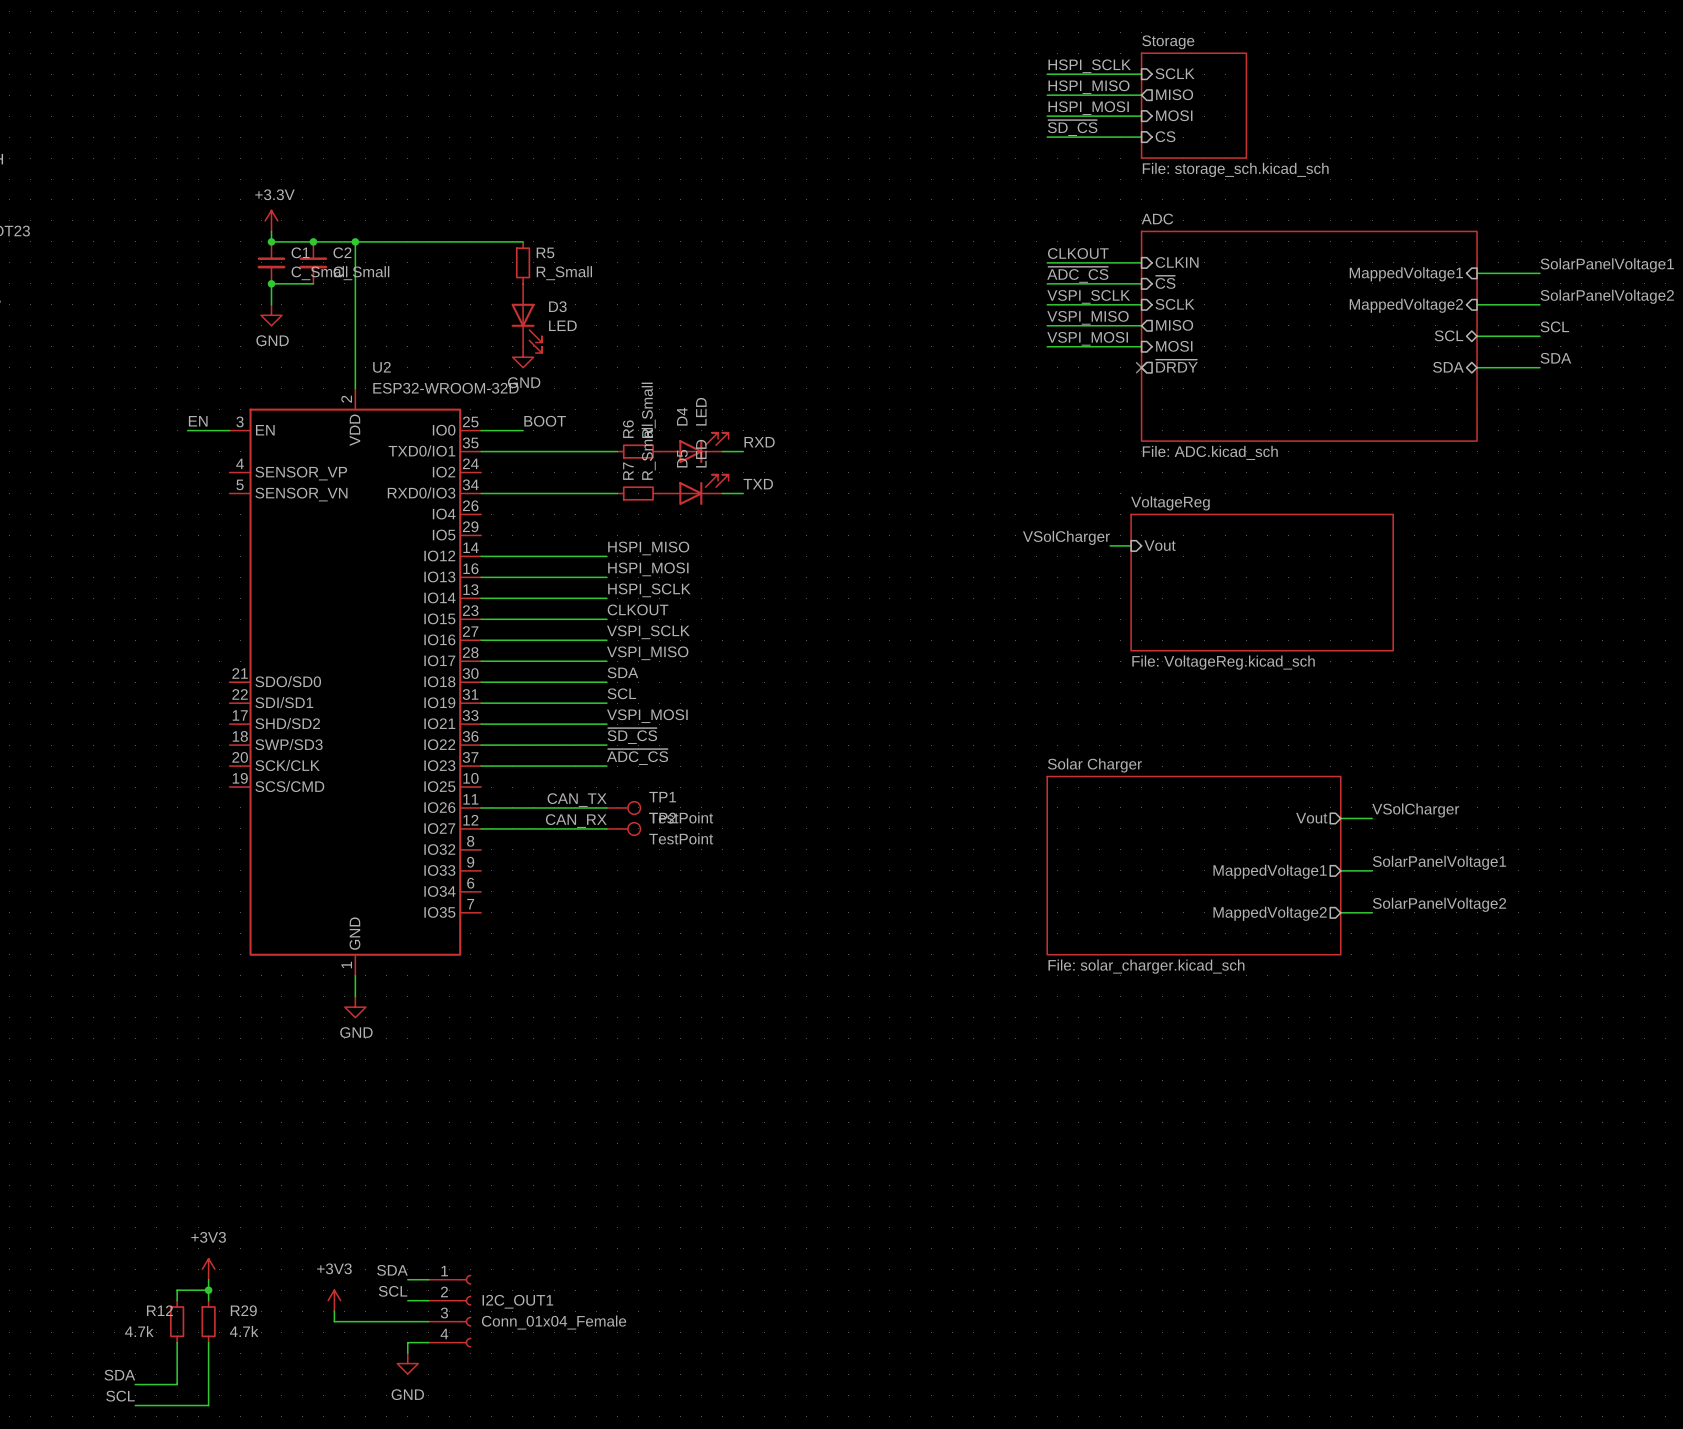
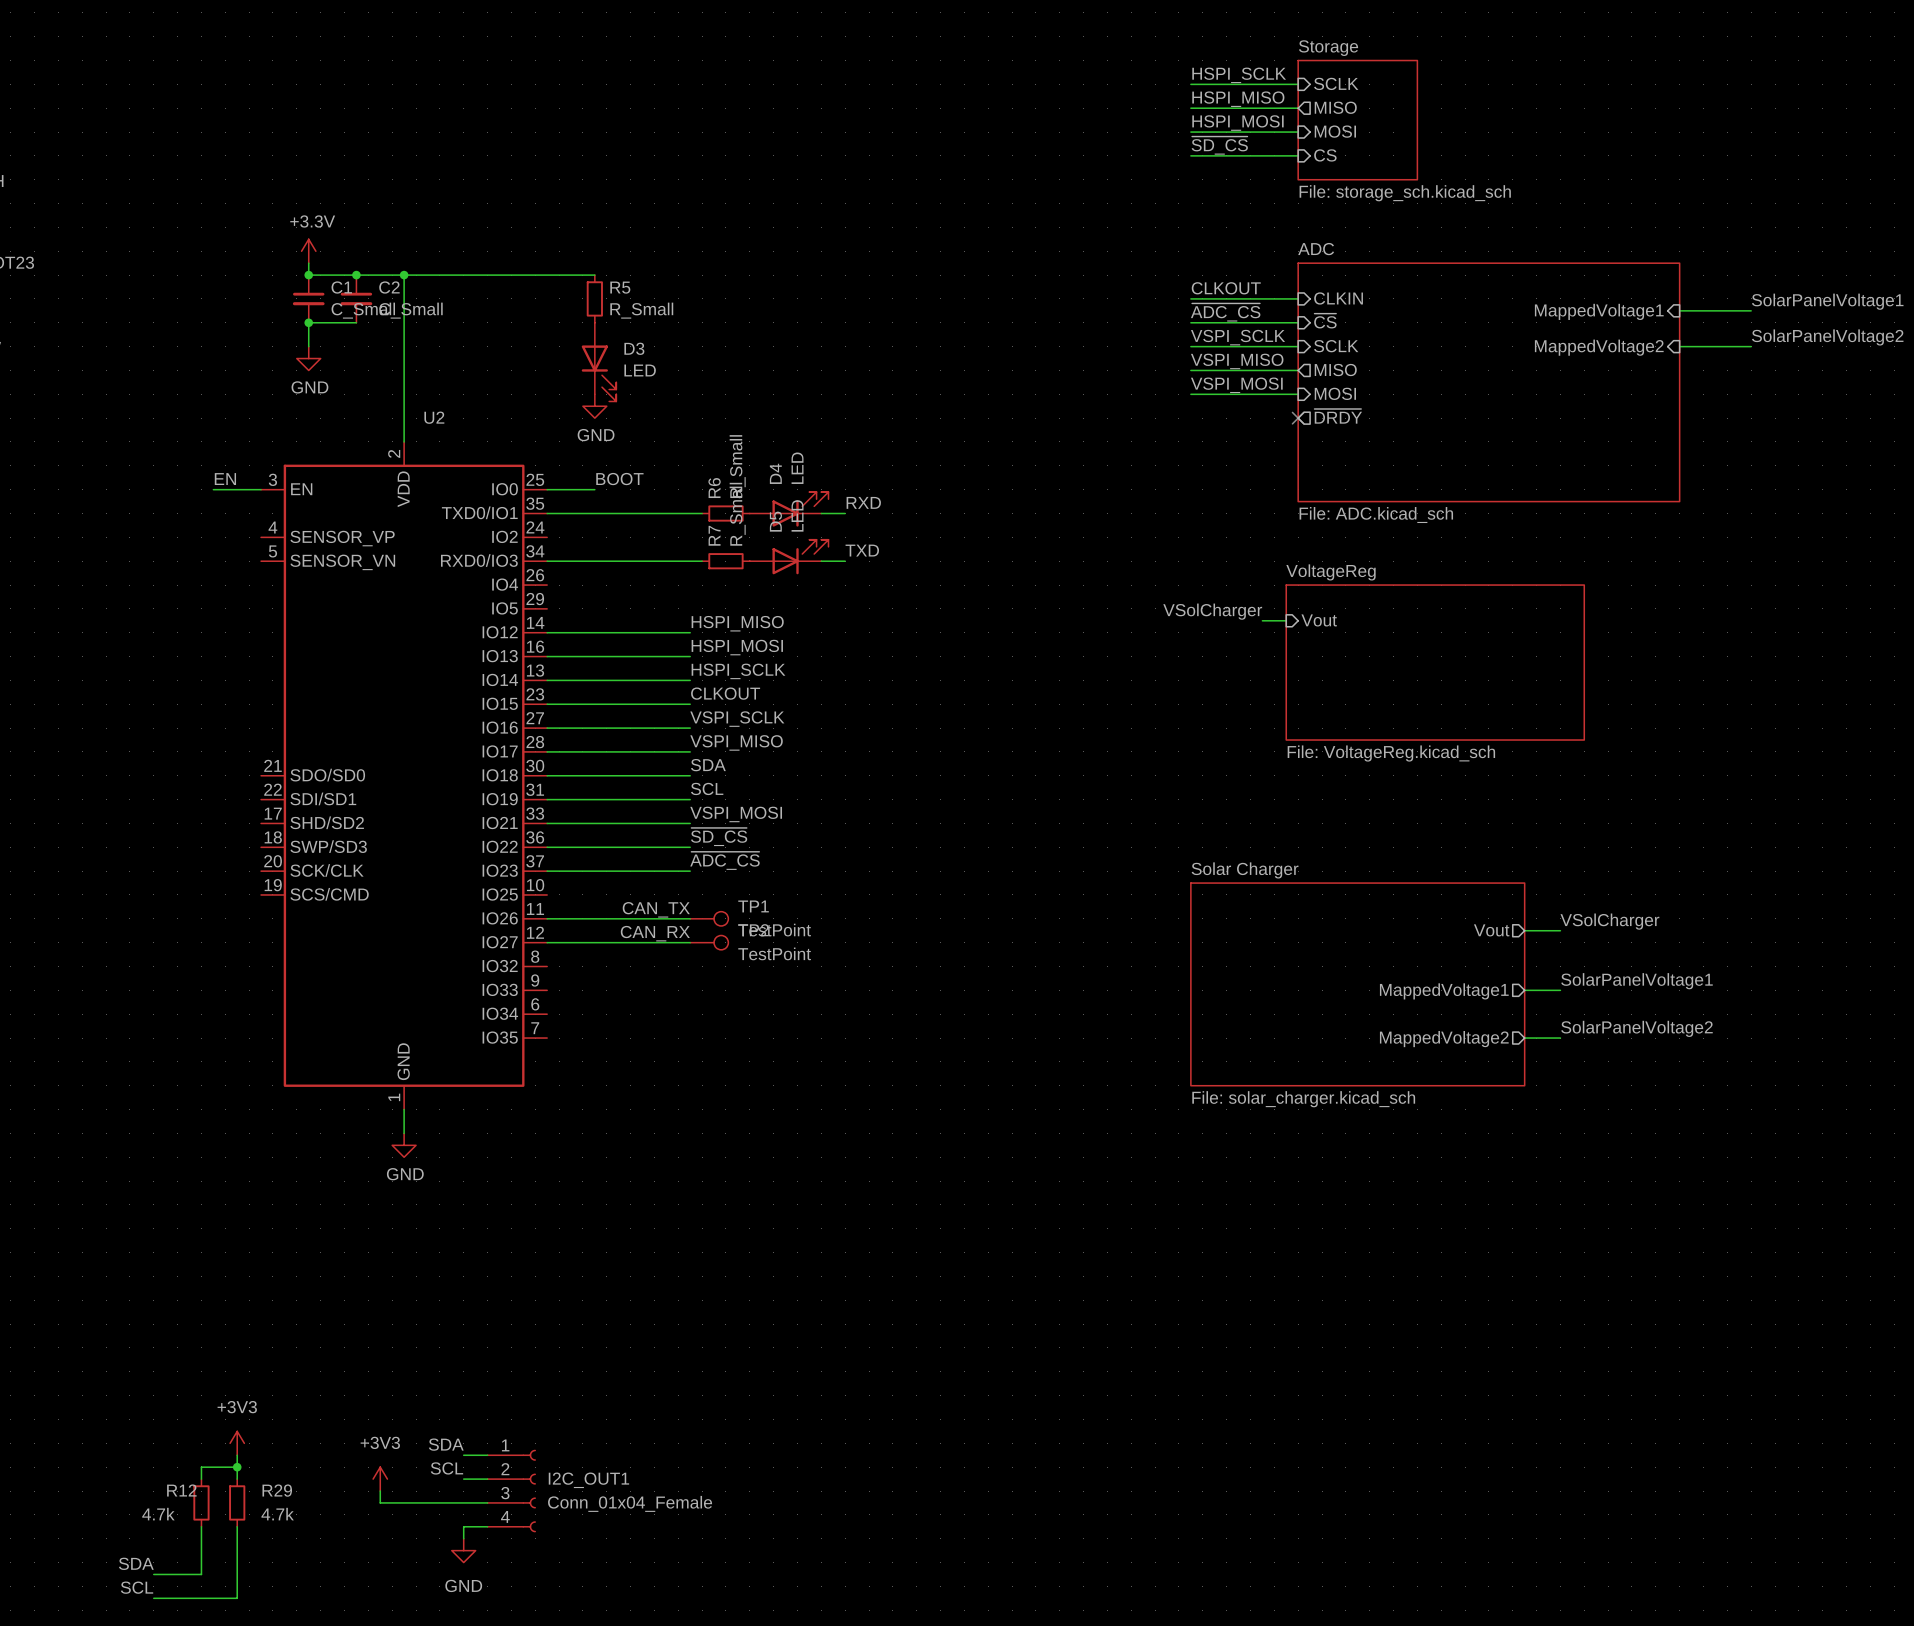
label: SCL (1554, 326) -> none
sheet pin: SCL (1448, 335) -> none
wire: (1477, 336) (1539, 336) -> none
label: SDA (1555, 358) -> none
sheet pin: SDA (1448, 367) -> none
wire: (1477, 367) (1539, 367) -> none
U2 value: ESP32-WROOM-32D (445, 388) -> none

